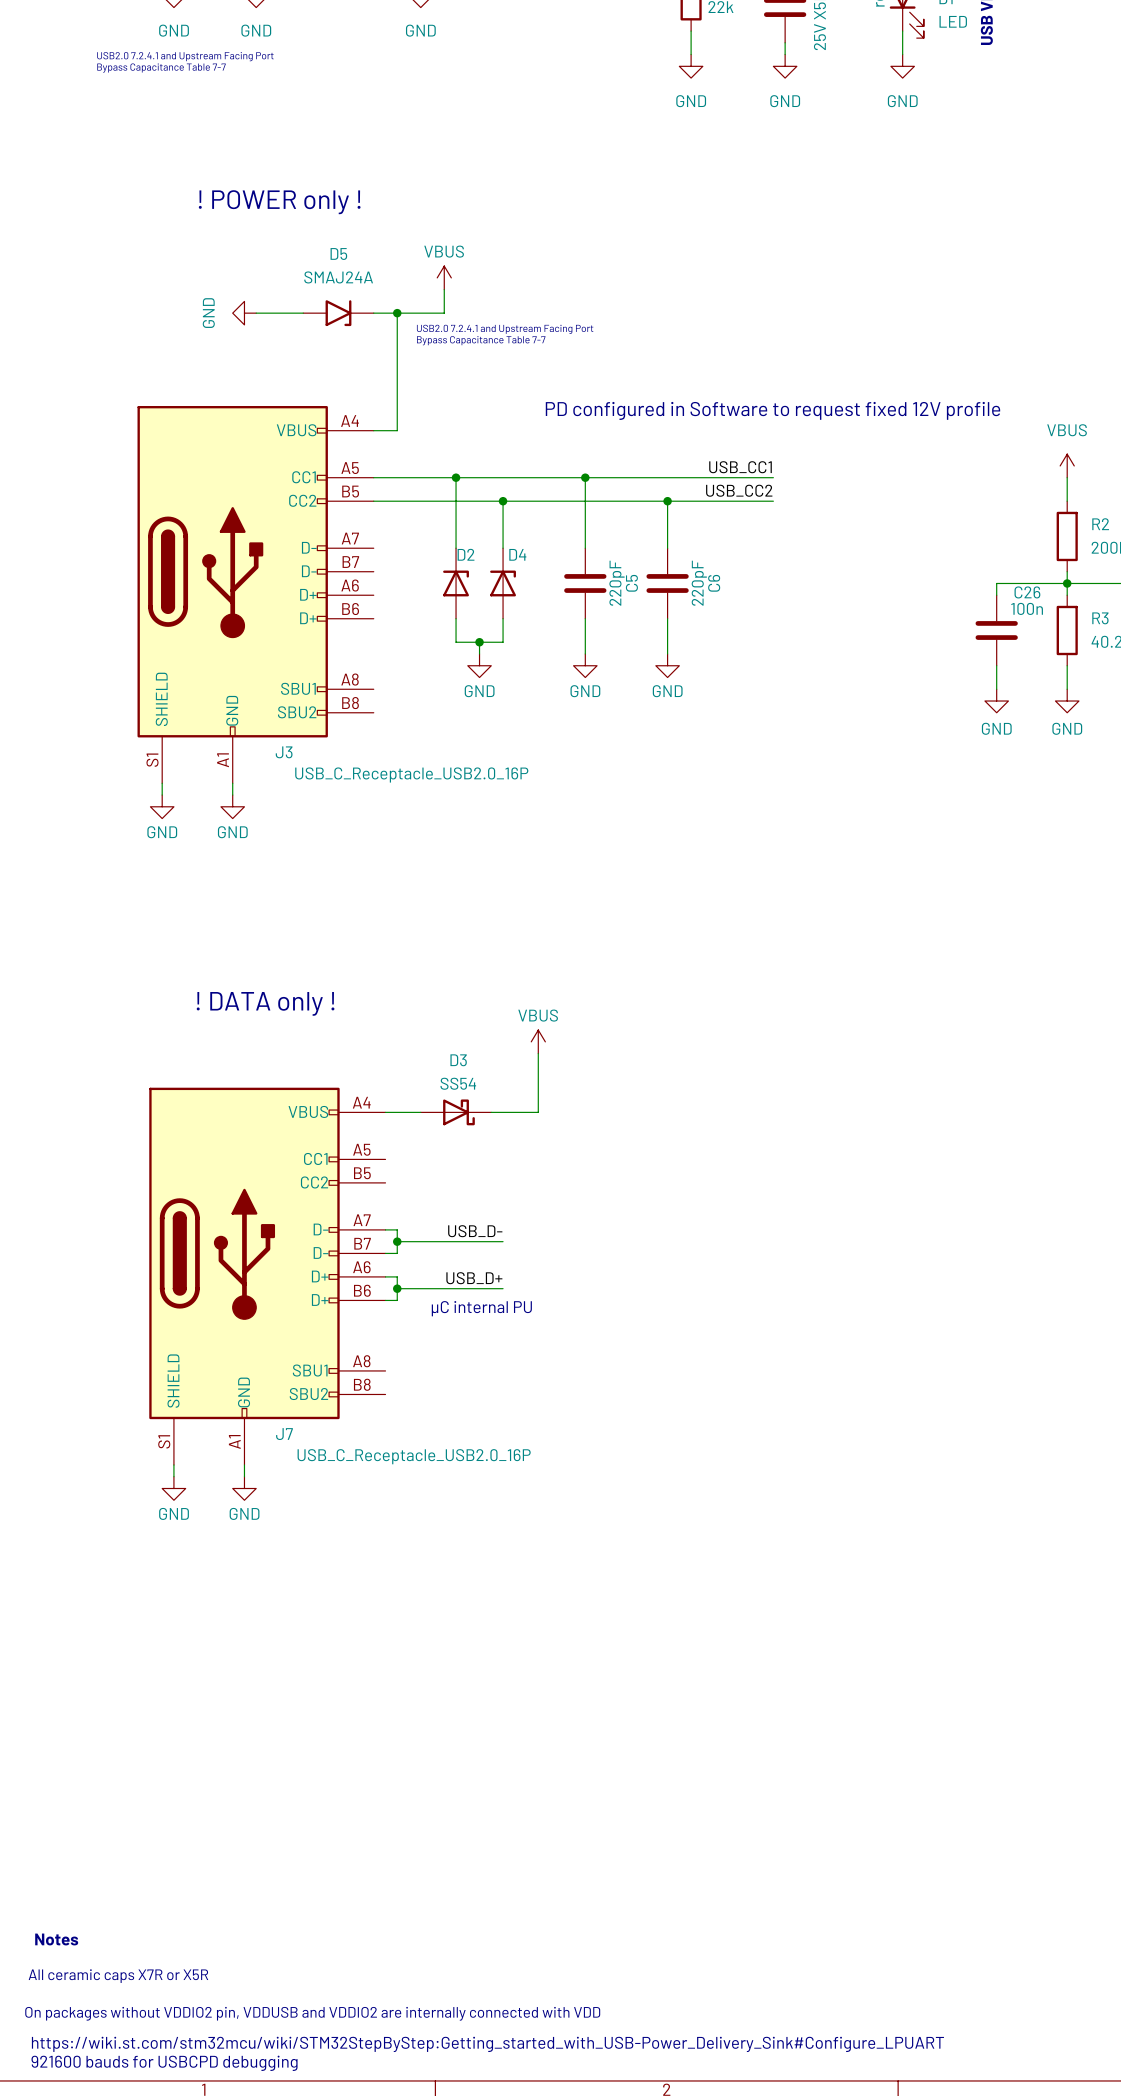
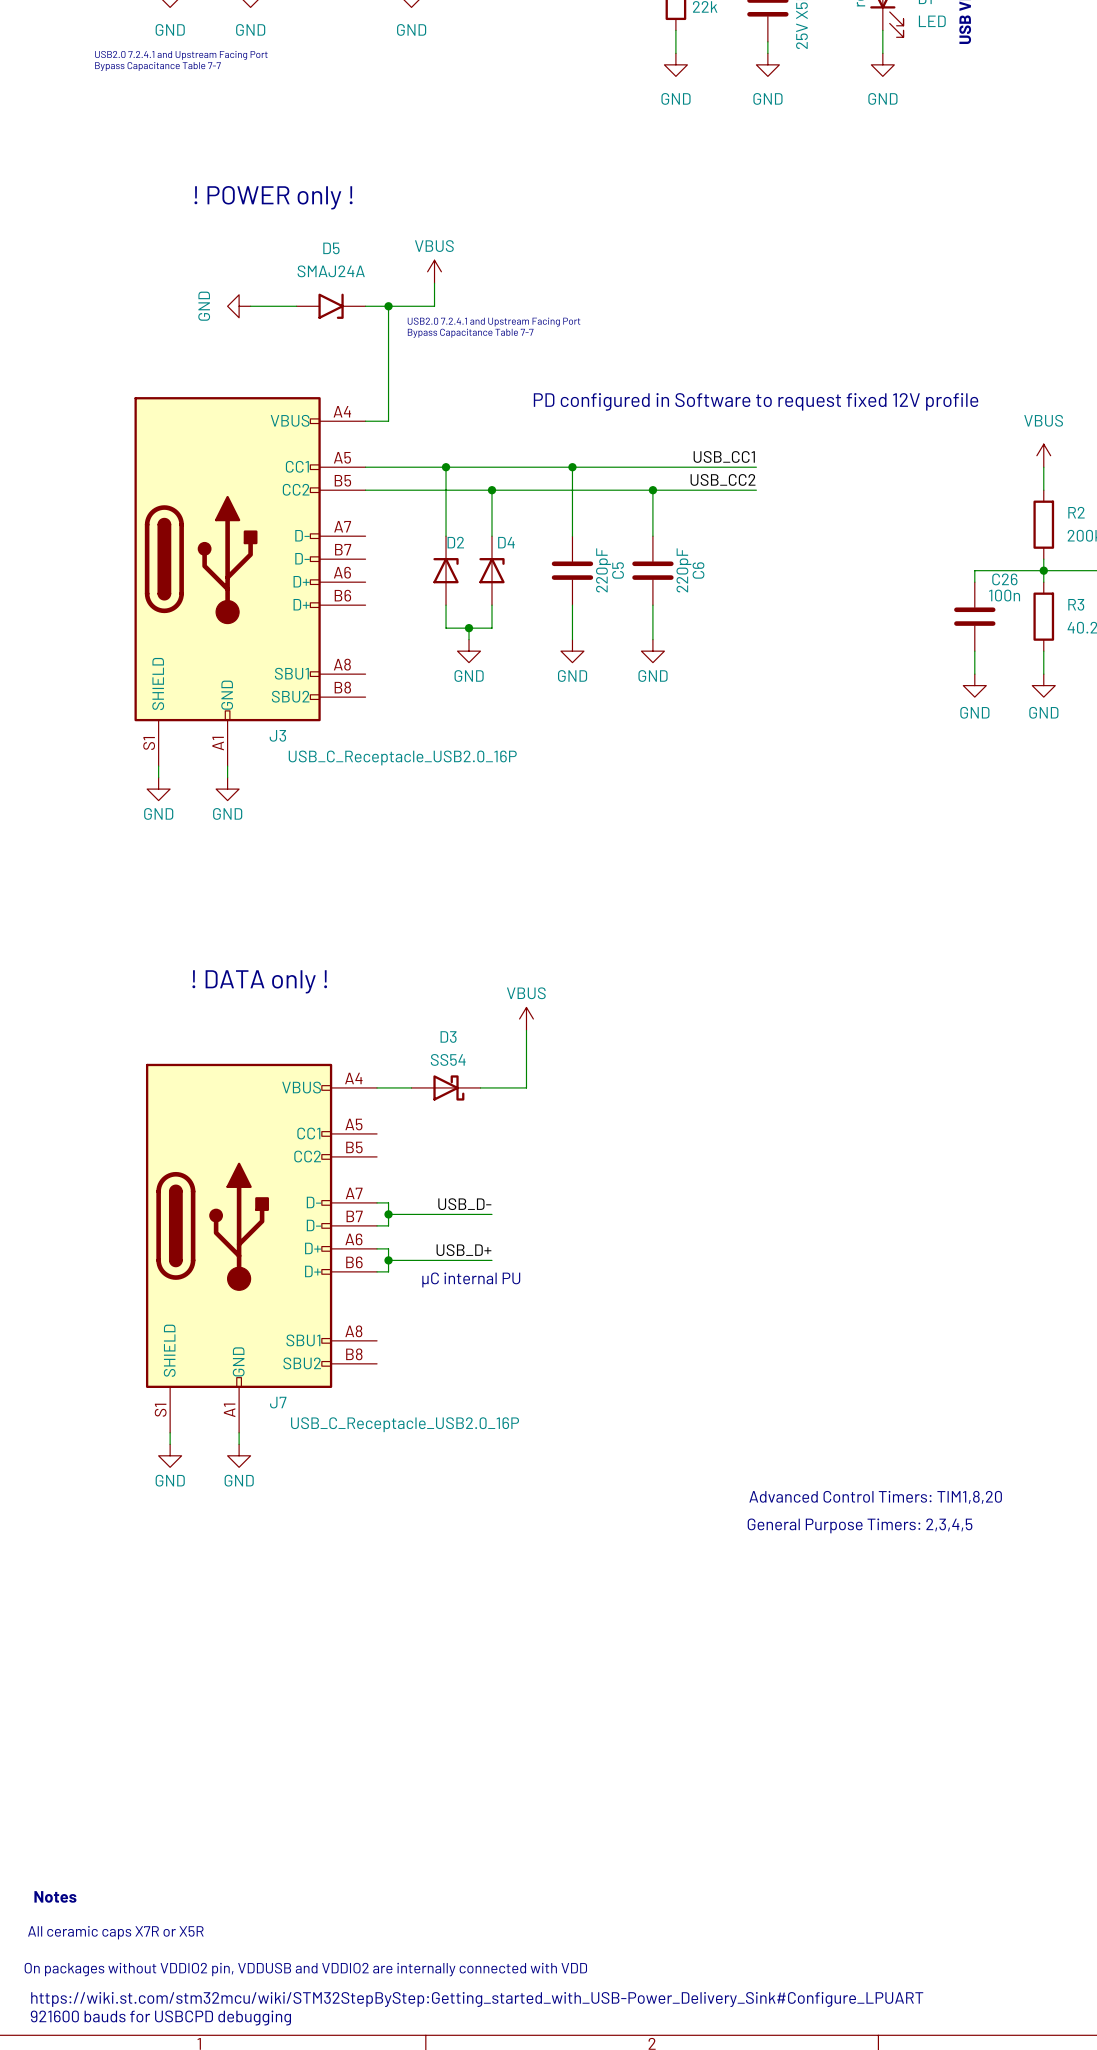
text: none -> Advanced Control Timers: TIM1,8,20 (875, 1497)
text: none -> General Purpose Timers: 2,3,4,5 (860, 1525)

